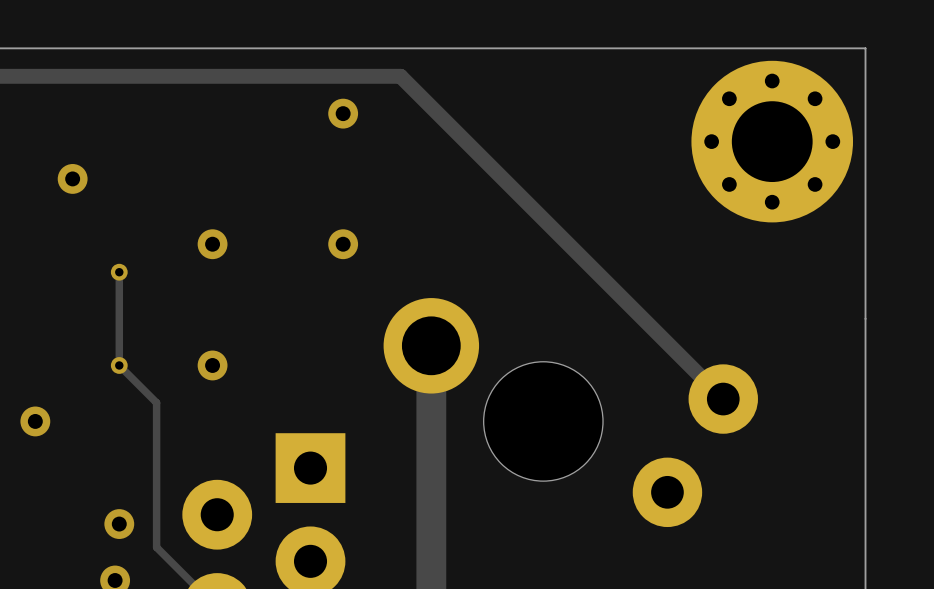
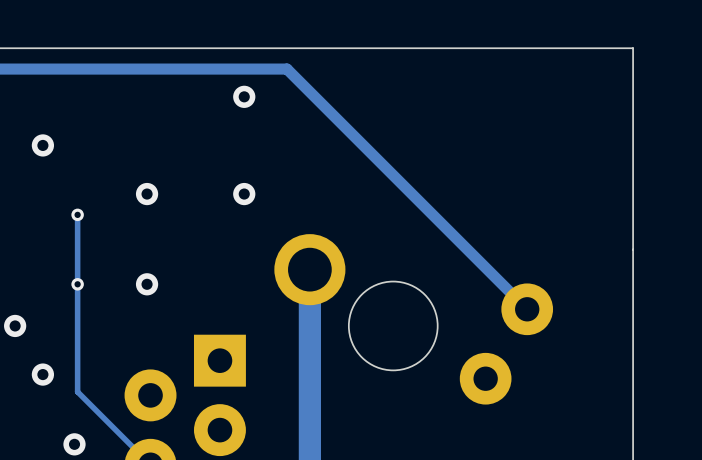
part: (772, 141) -> none
track: (119, 365) (156, 402) (156, 547) -> (77, 284) (77, 391) (105, 419)
via position: (119, 524) -> (42, 374)

